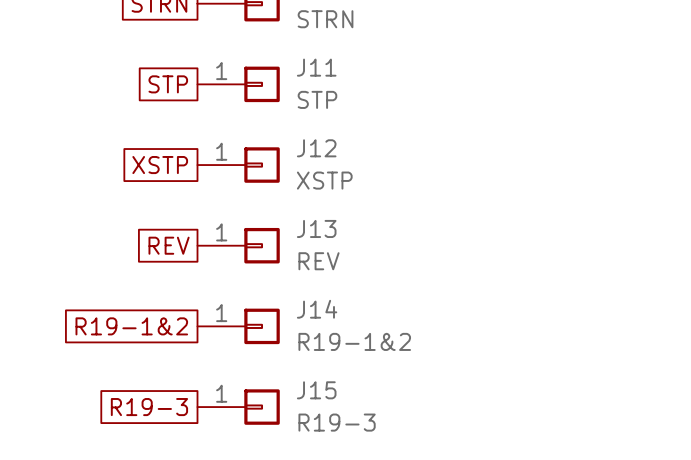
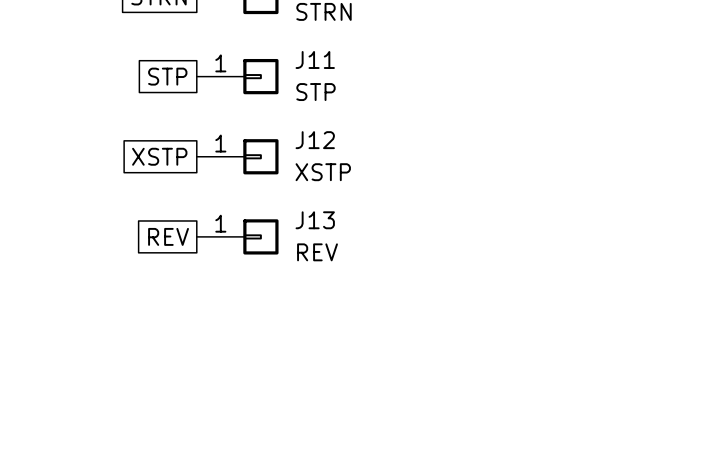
global label: R19-1&2 (131, 326) -> none
J14: R19-1&2 (238, 326) -> none
global label: R19-3 (149, 407) -> none
J15: R19-3 (238, 407) -> none

